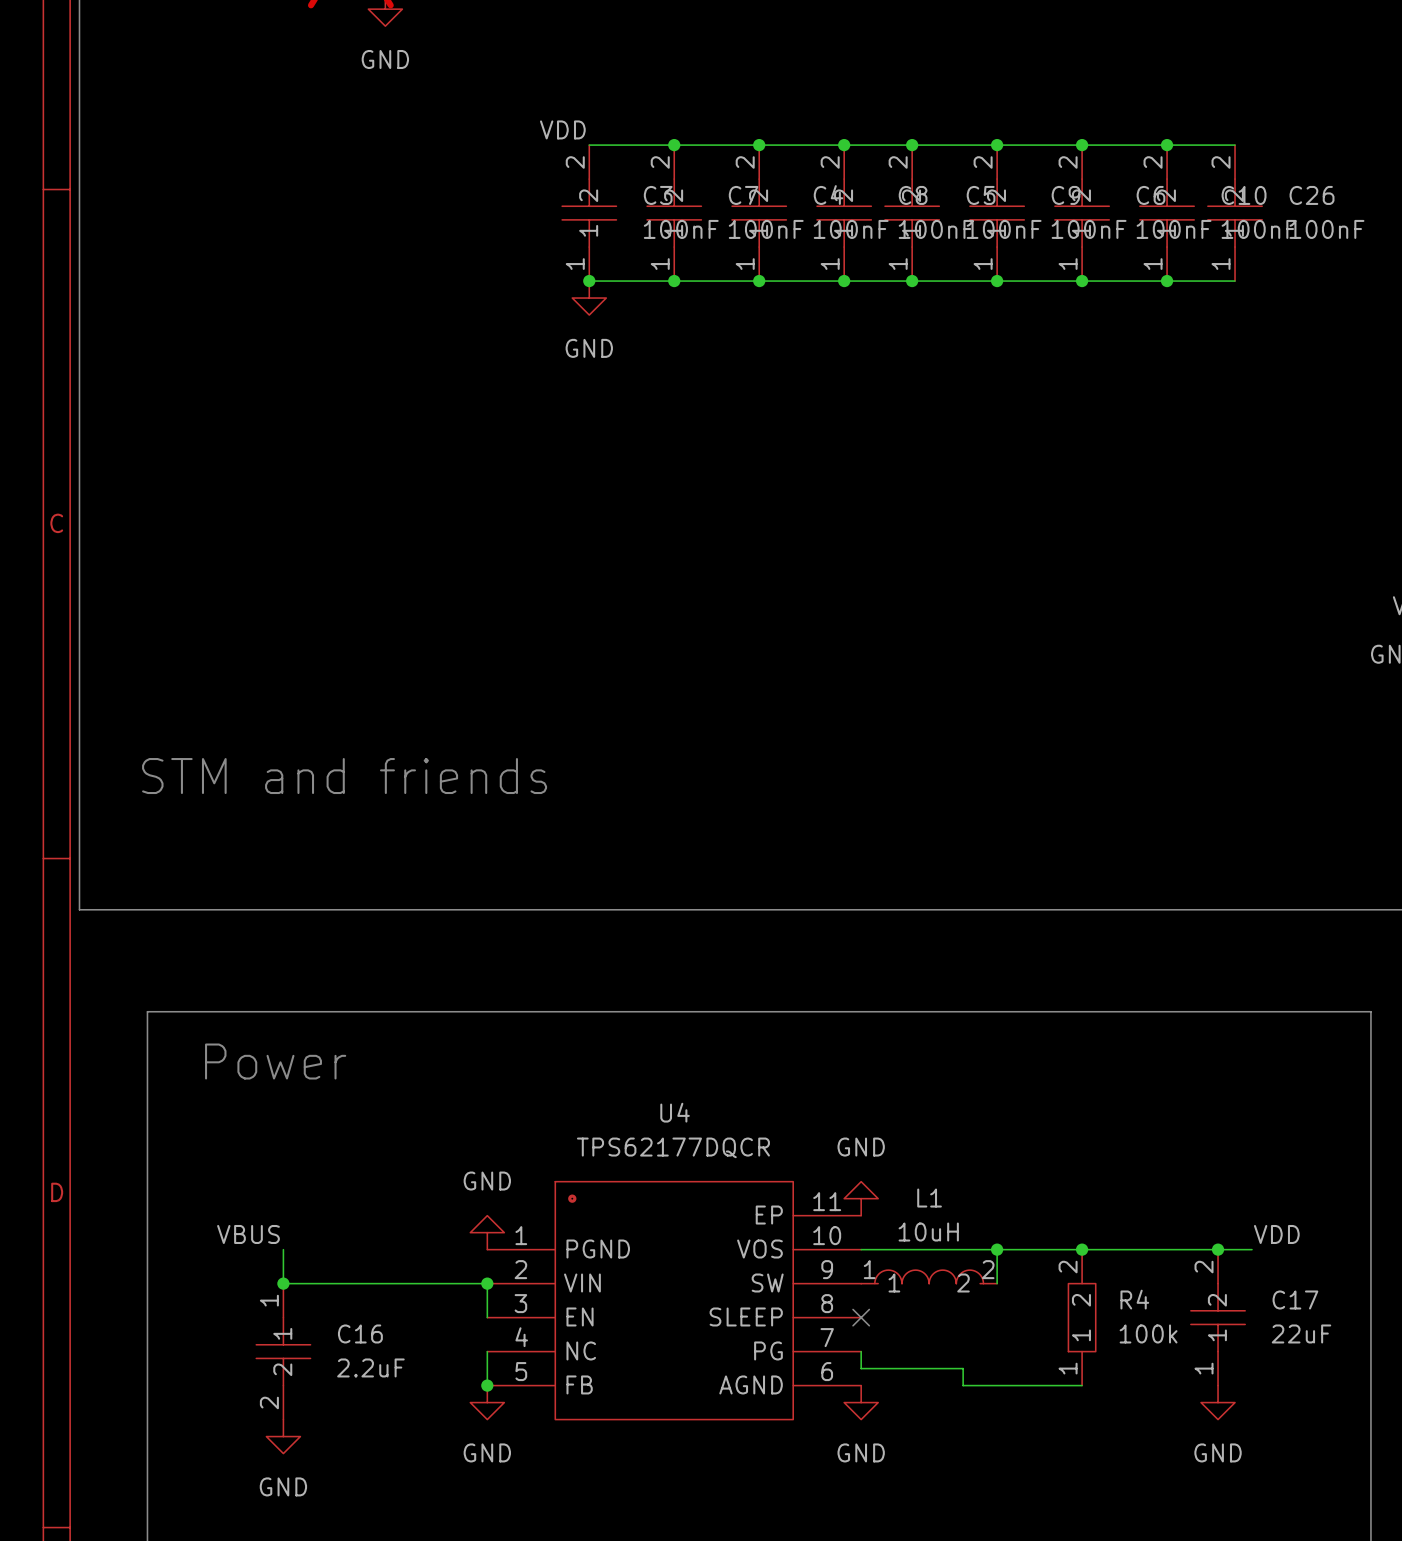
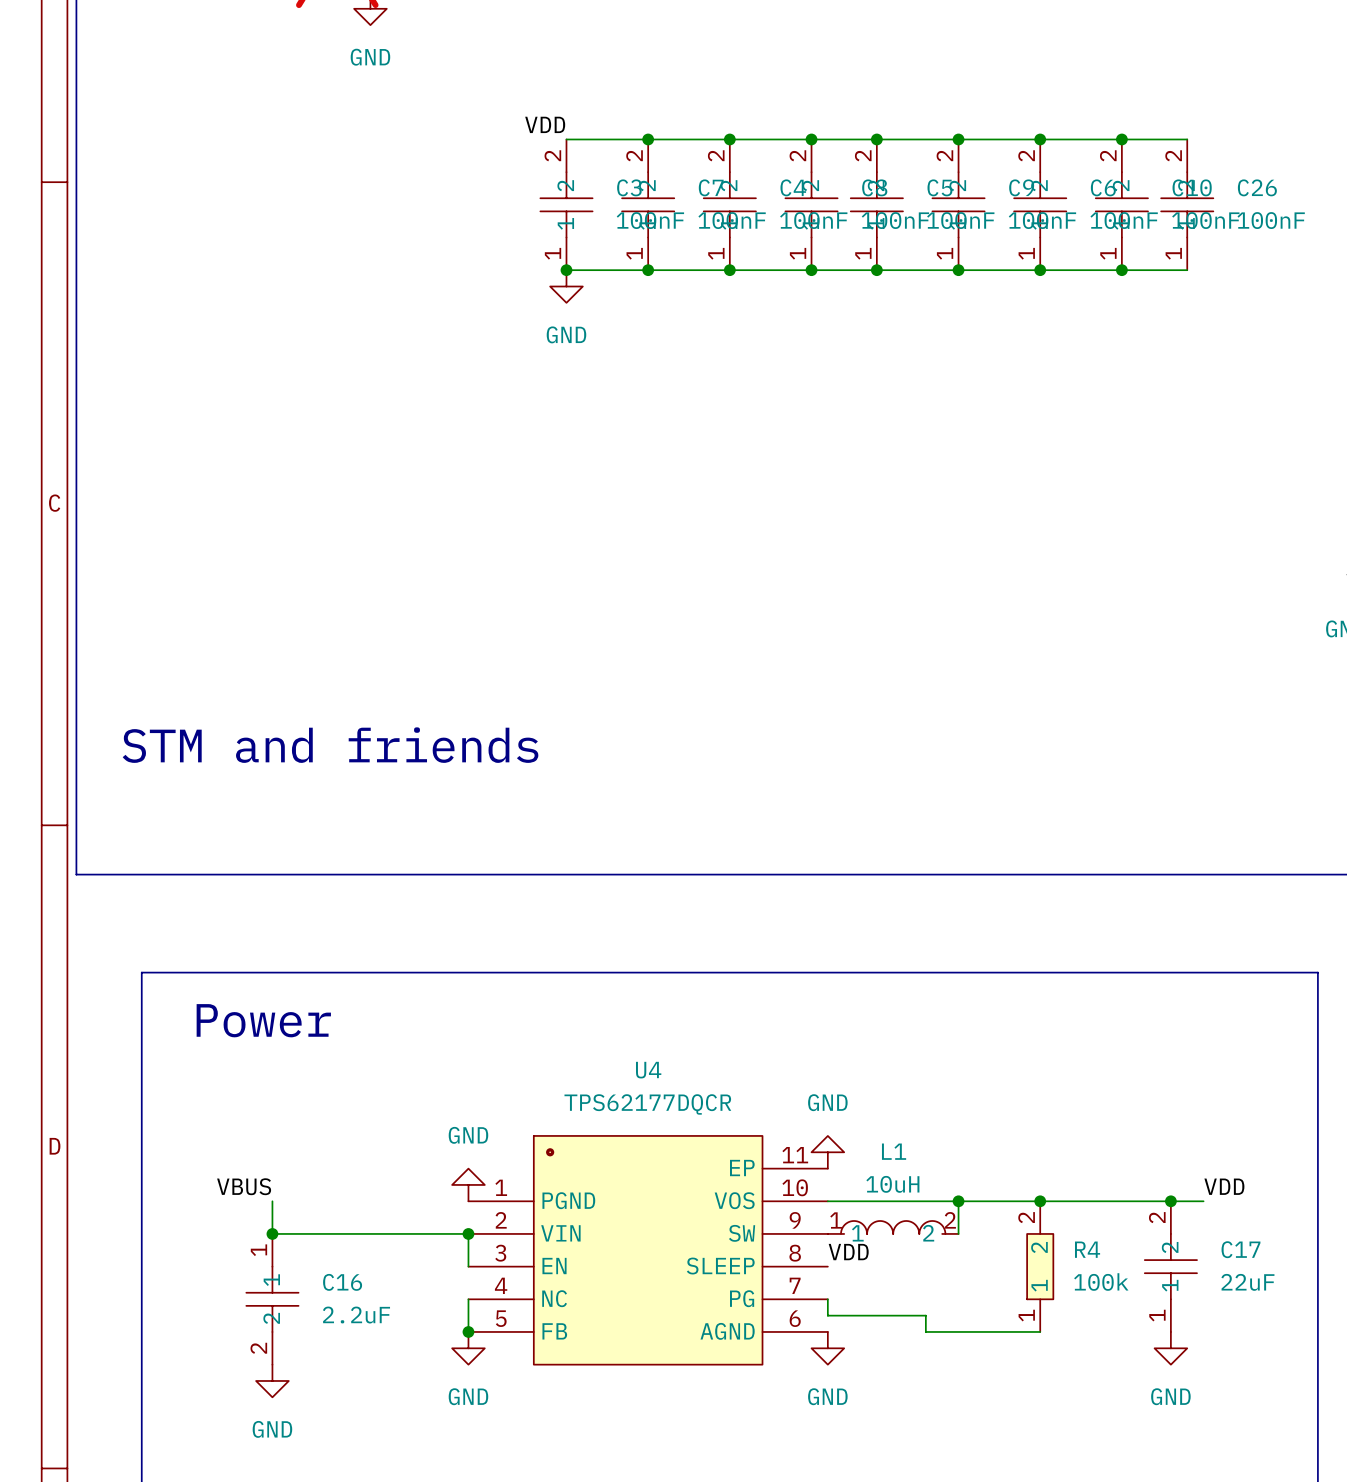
label: none -> VDD (848, 1252)
no-connect mark: (861, 1317) -> none

